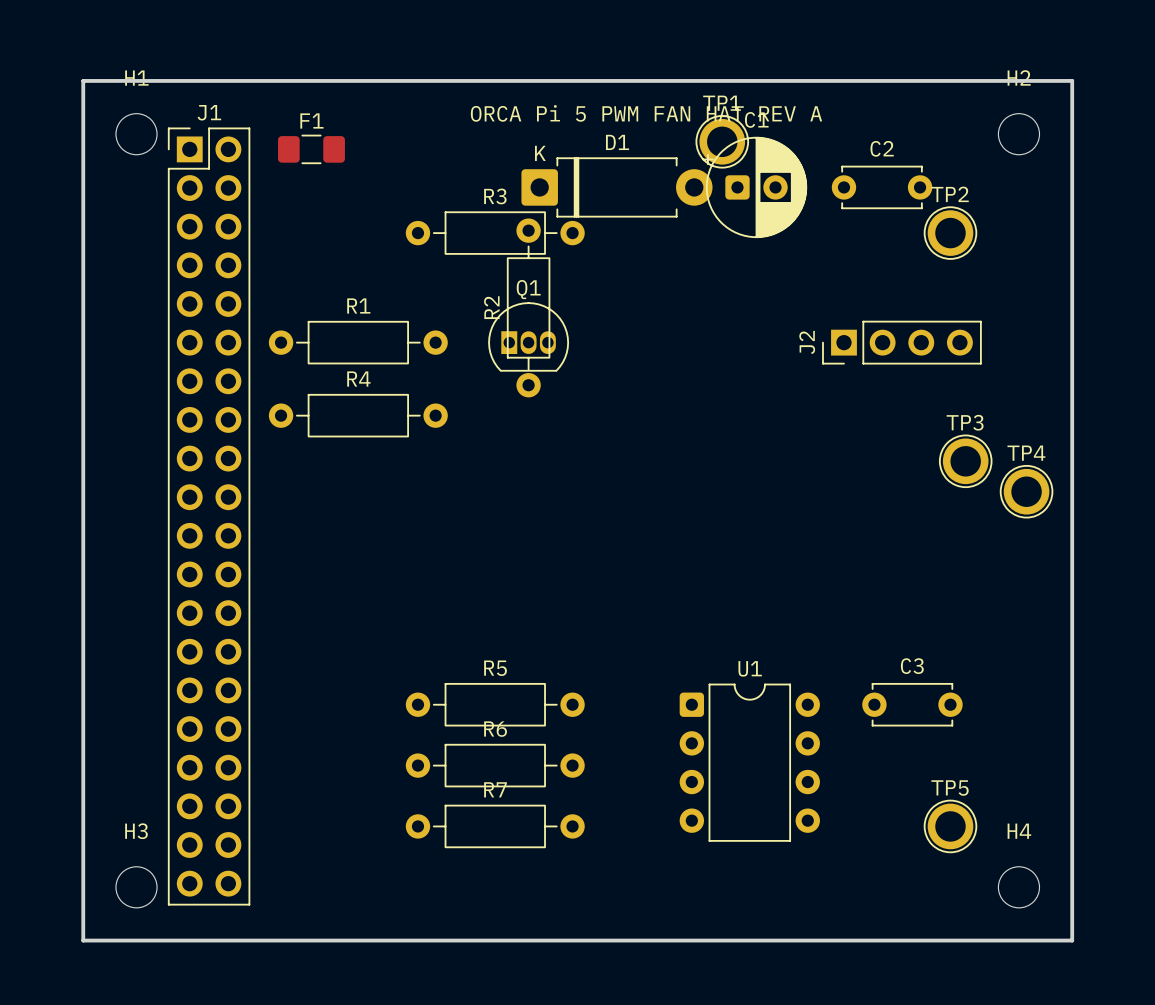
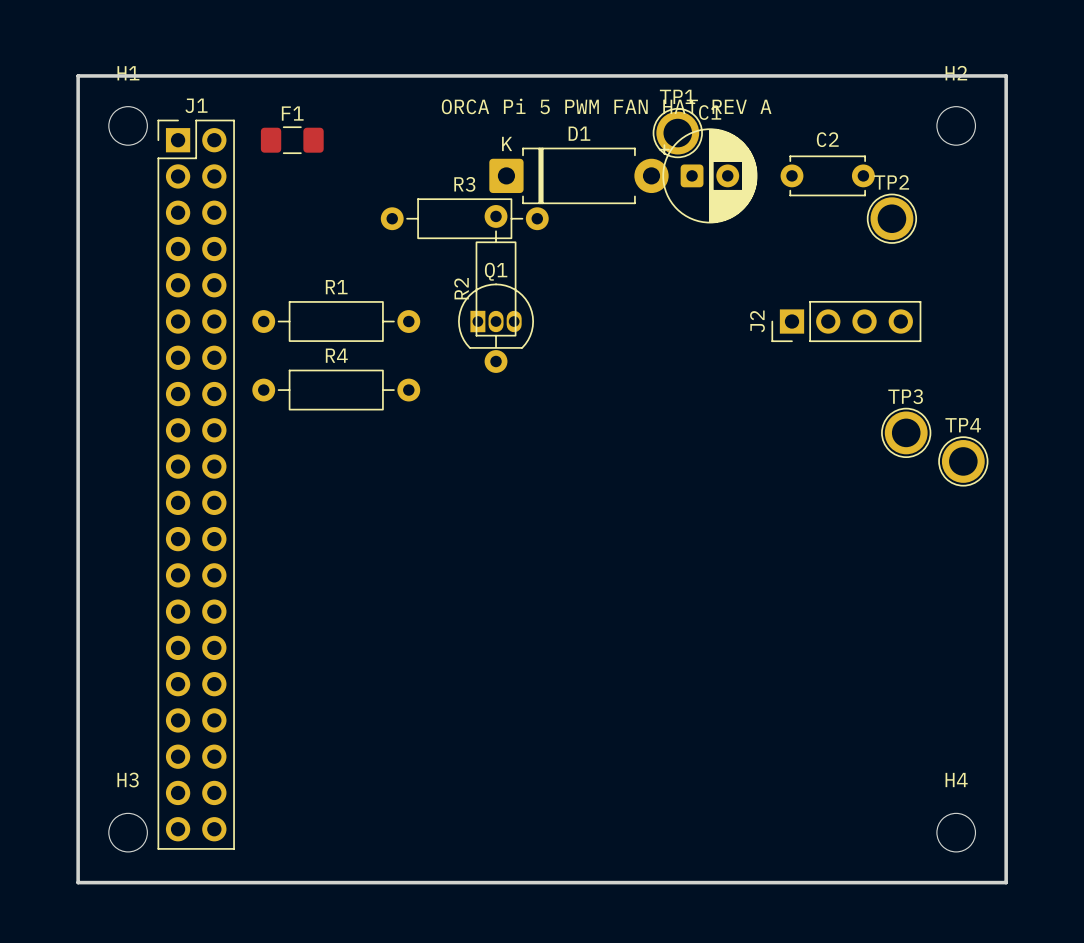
R5: (495, 704) -> none
C3: (912, 704) -> none
U1: (749, 762) -> none
R6: (495, 765) -> none
R7: (495, 826) -> none
TP5: (950, 826) -> none

